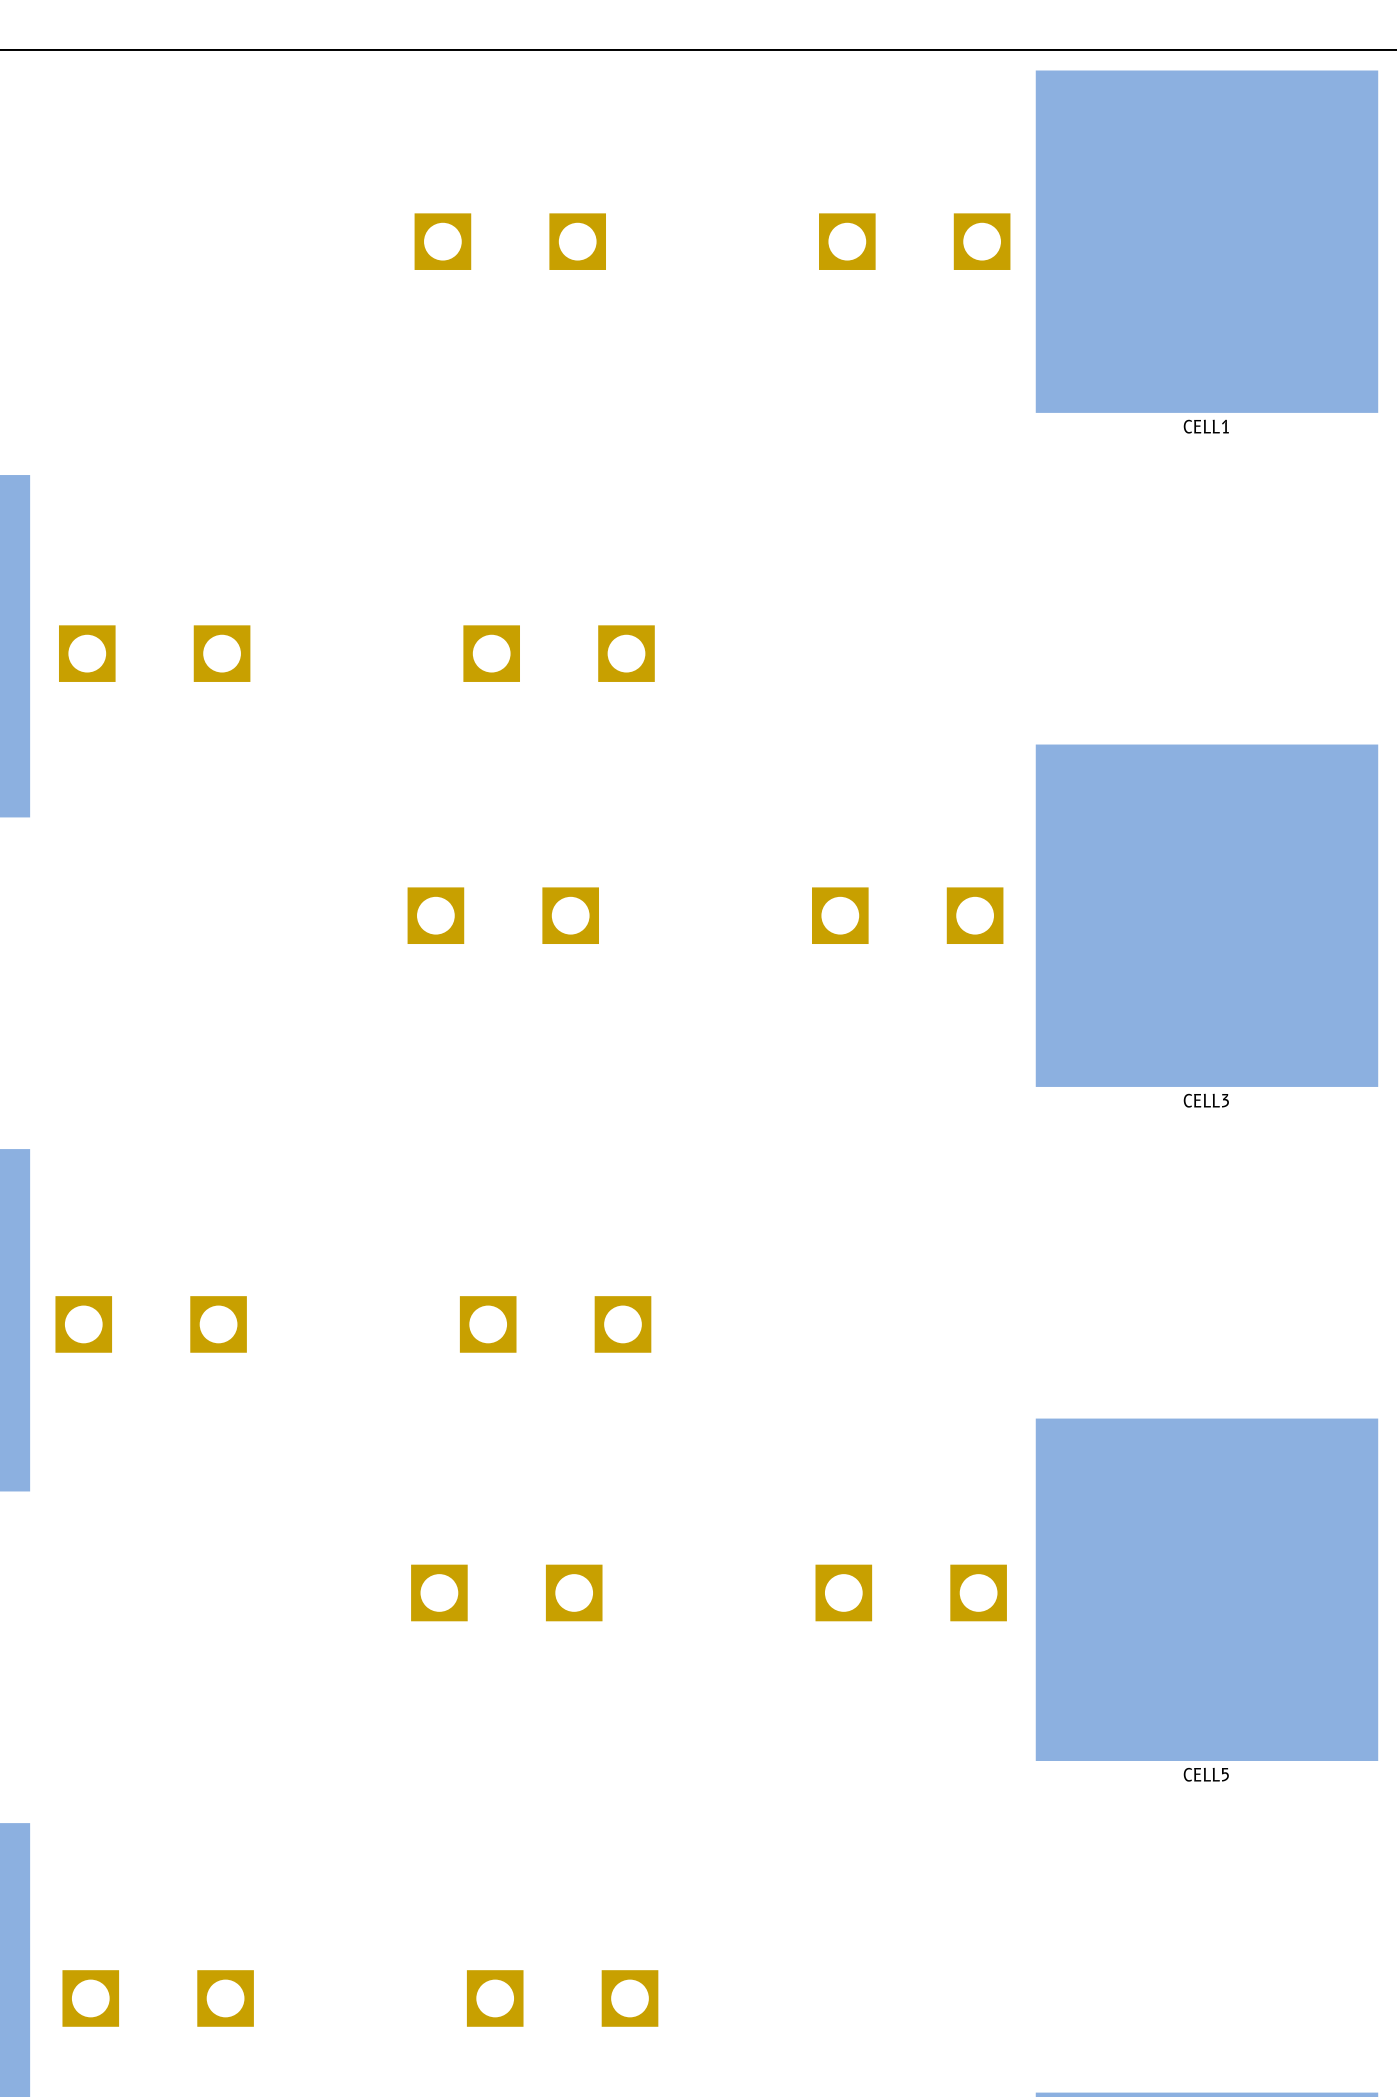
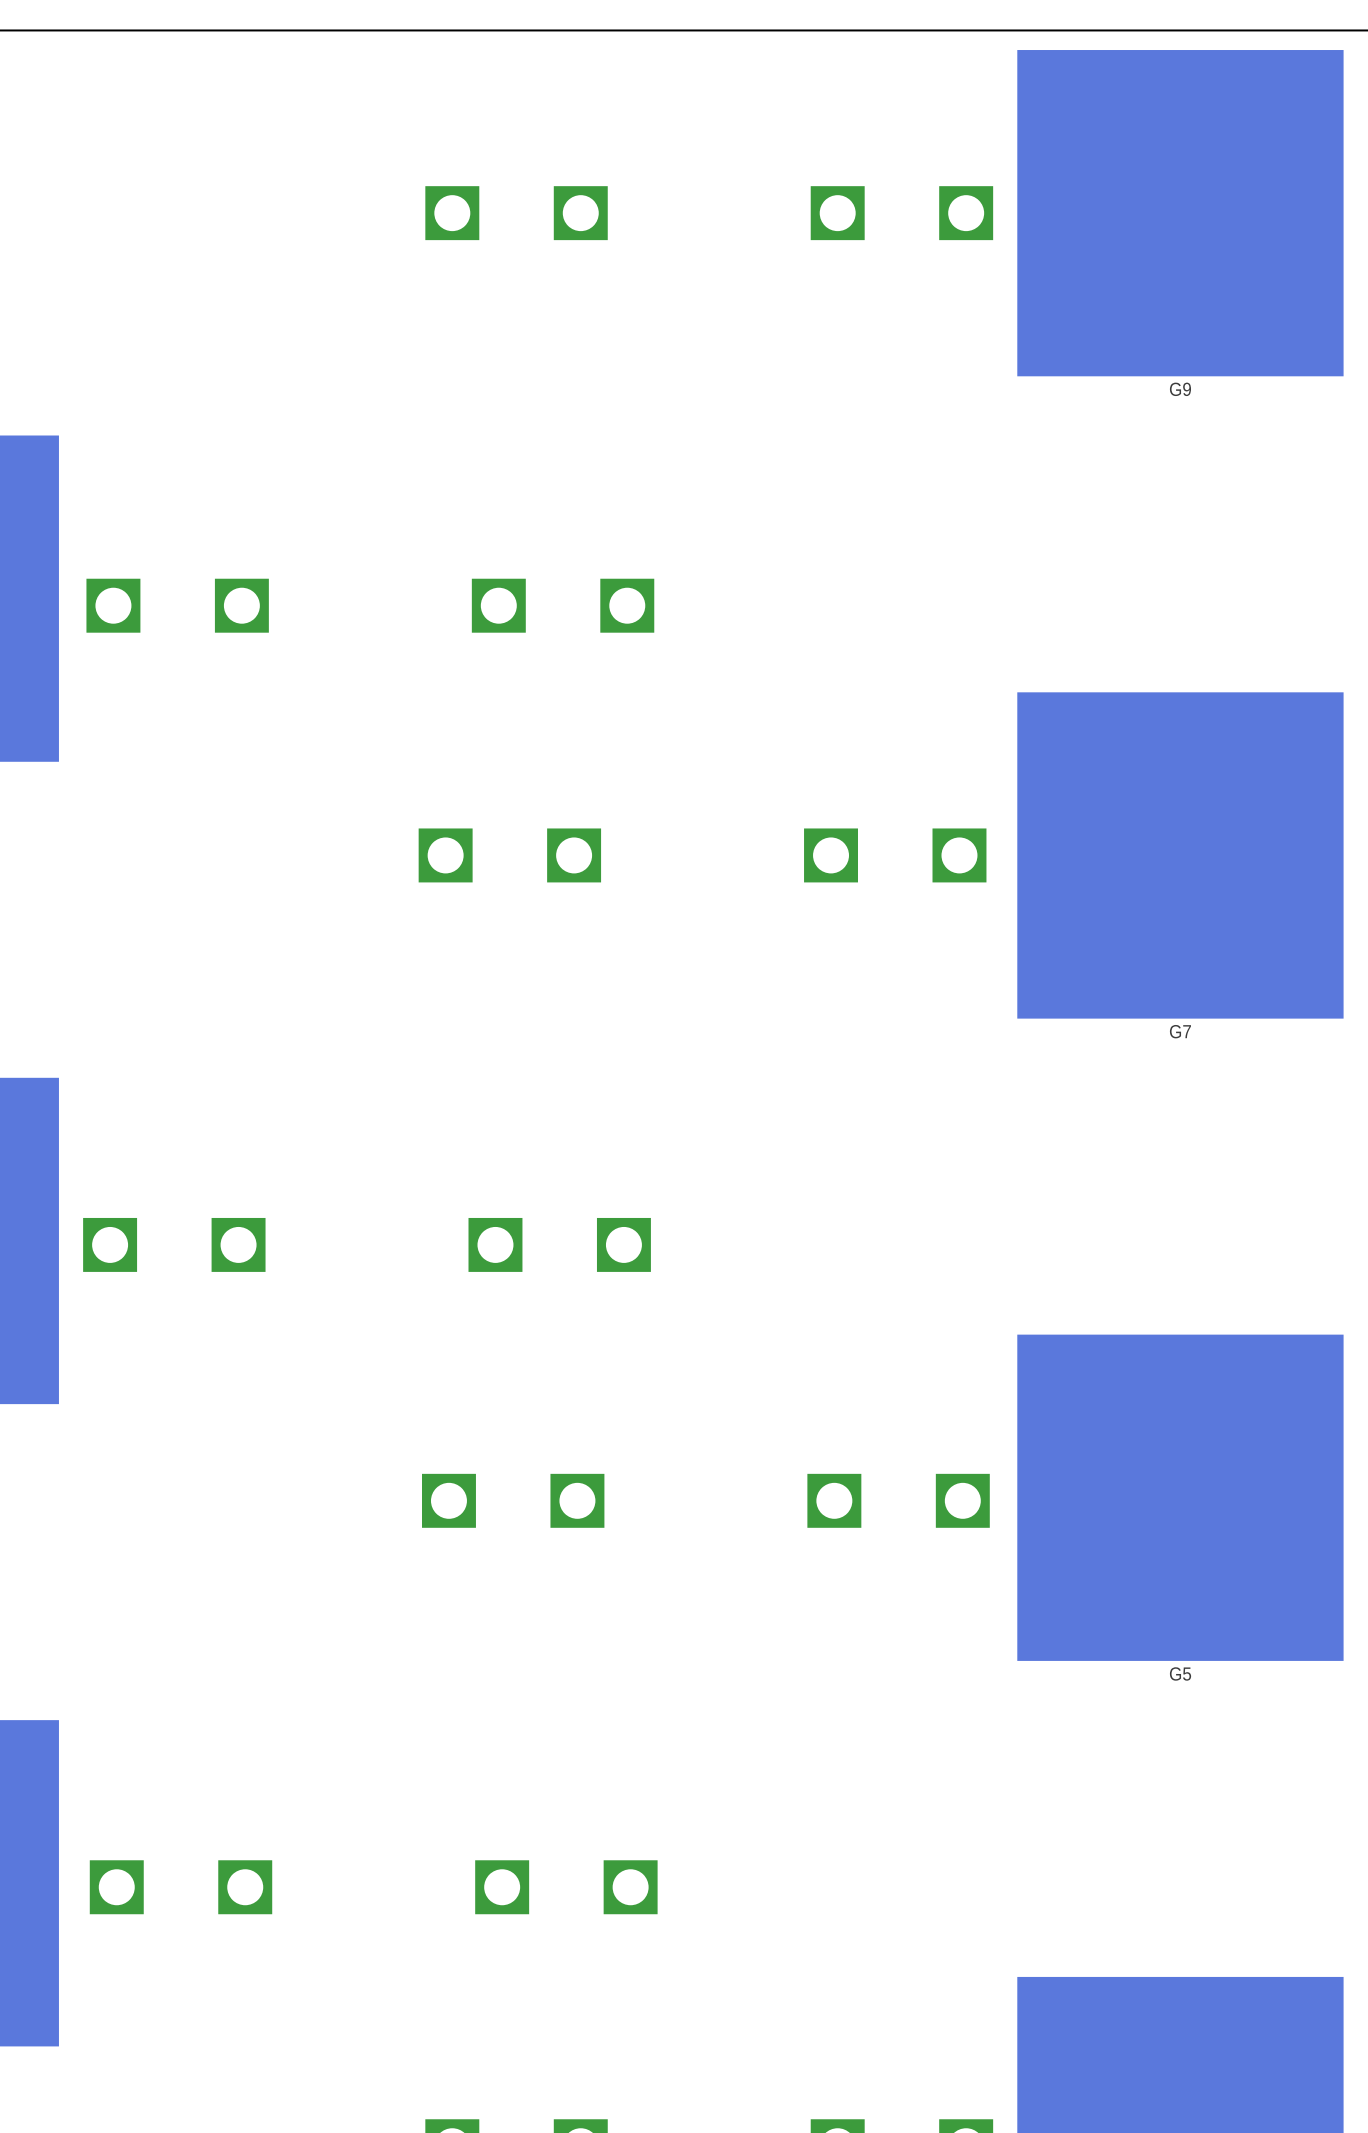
CELL1 name: CELL1 (1206, 426) -> G9 (1180, 389)
CELL3 name: CELL3 (1206, 1100) -> G7 (1180, 1031)
CELL5 name: CELL5 (1206, 1774) -> G5 (1180, 1673)

